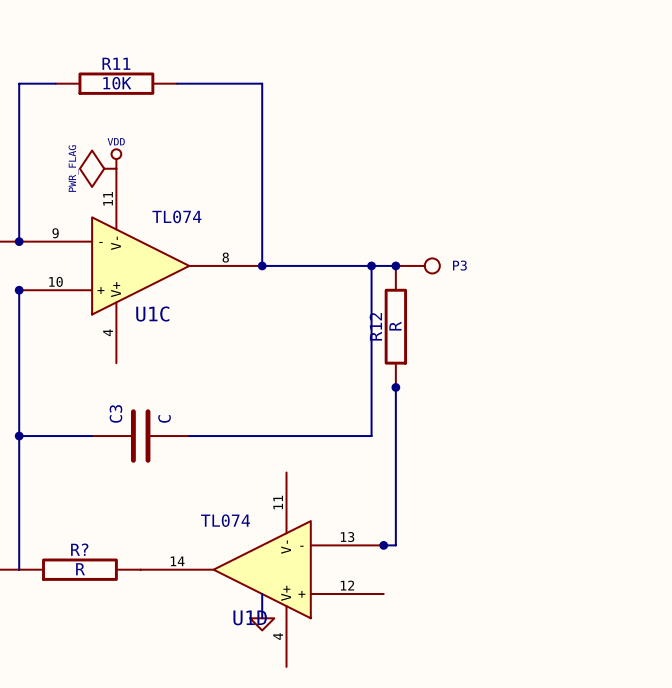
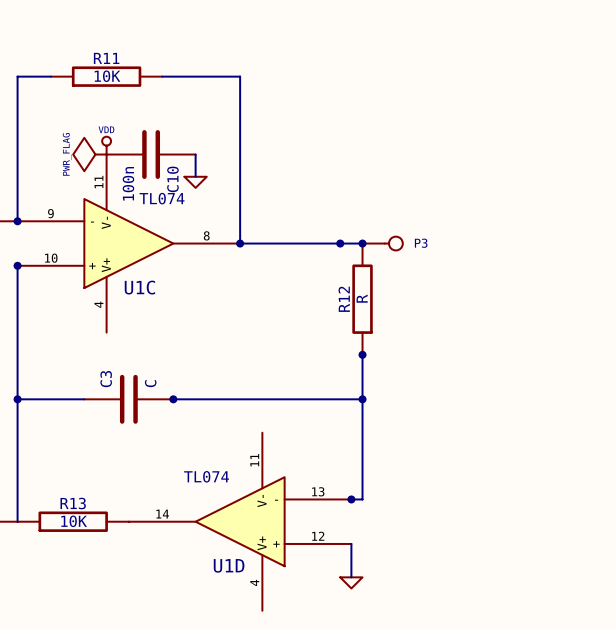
C10: none -> 100n (151, 154)
wire: none -> (195, 154) (195, 176)
power symbol: none -> (195, 182)
wire: (371, 265) (371, 436) -> (362, 399) (340, 399)
junction: none -> (173, 399)
junction: none -> (362, 399)
R? name: R? (79, 549) -> R13 (73, 503)
R? value: R (80, 569) -> 10K (74, 521)
wire: (262, 593) (262, 618) -> none
wire: none -> (351, 543) (351, 577)
power symbol position: (262, 624) -> (351, 582)

